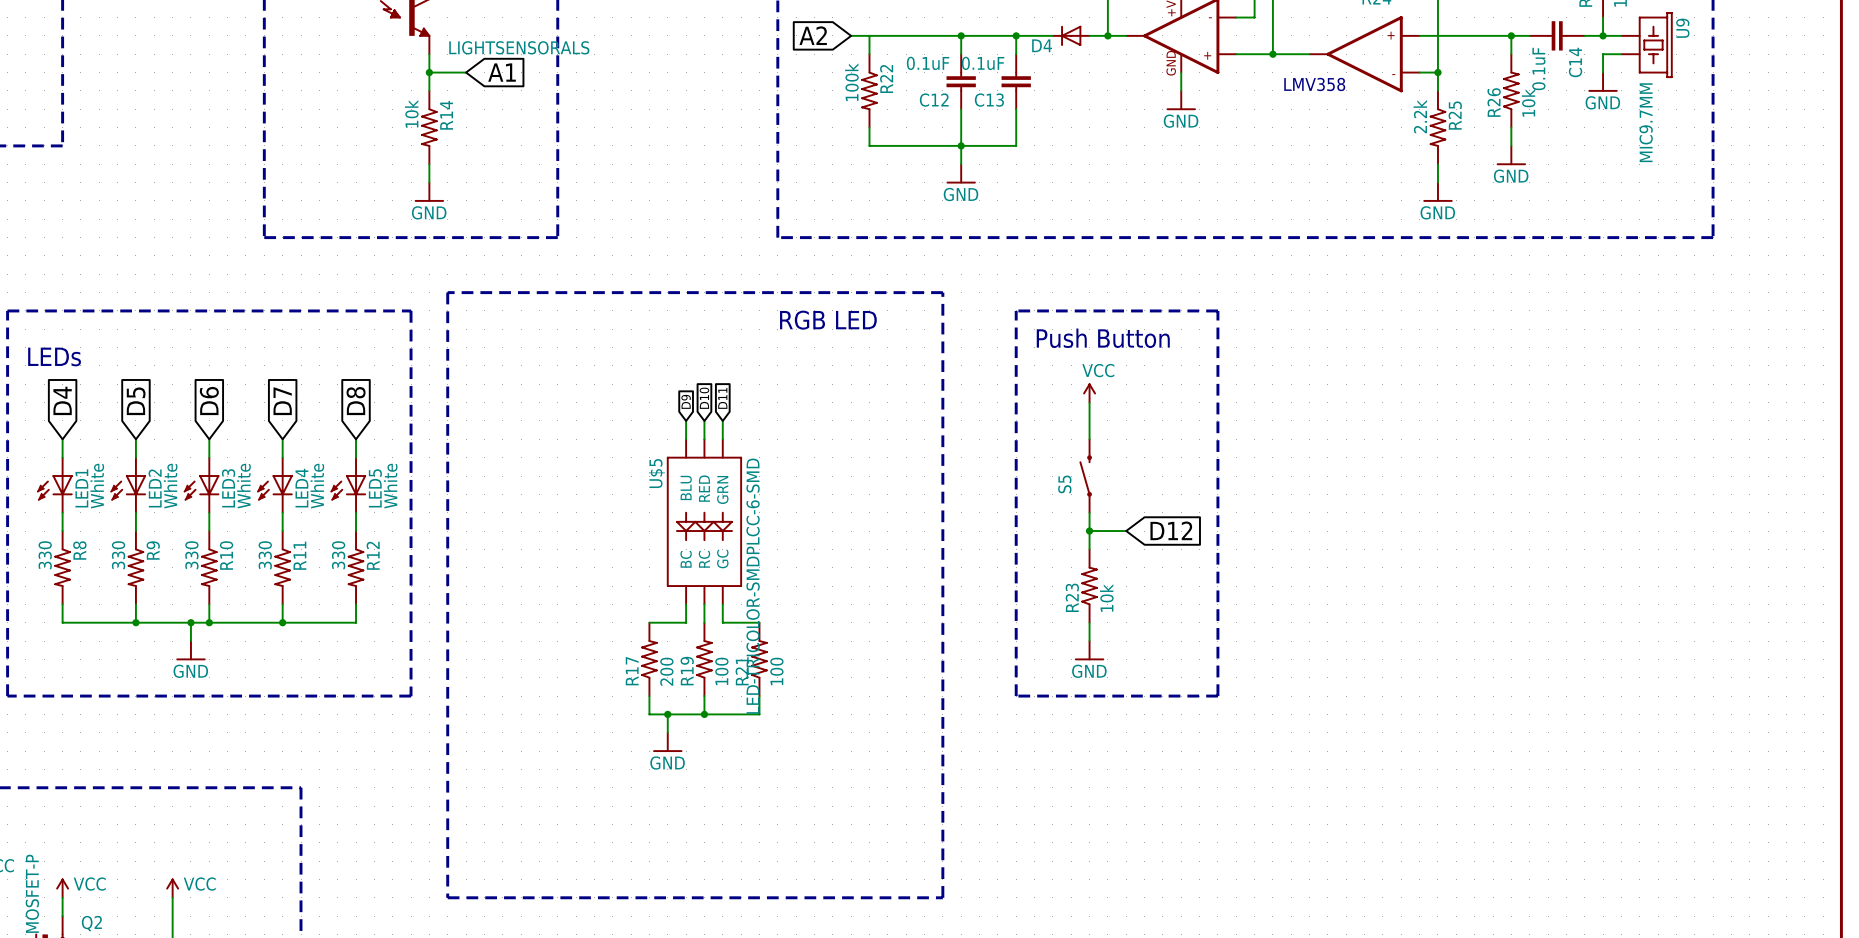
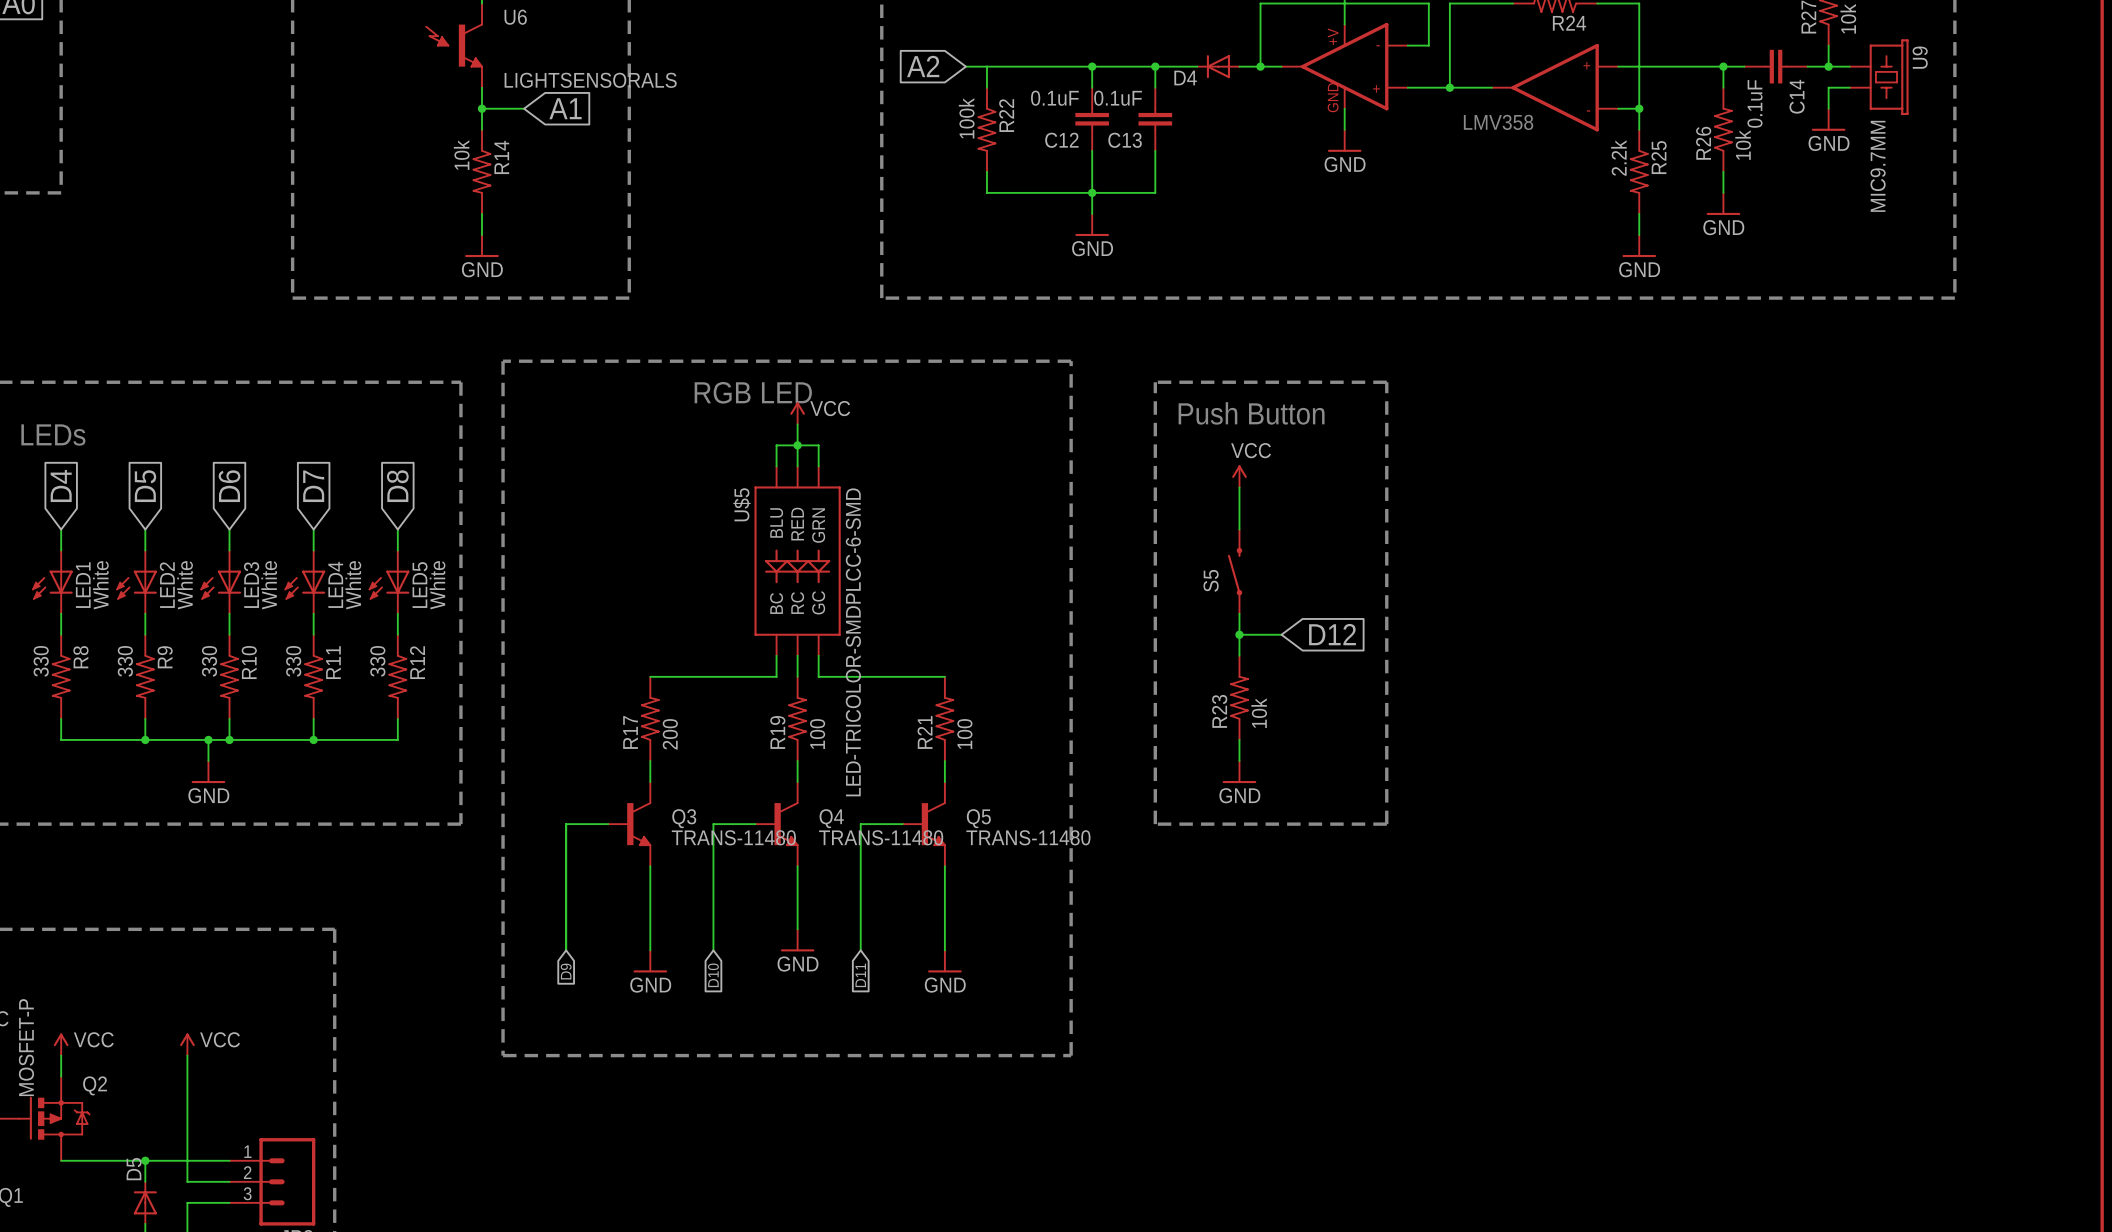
text position: RGB LED (828, 320) -> RGB LED (753, 392)
power symbol: none -> VCC (797, 413)
wire: none -> (797, 424) (797, 466)
junction: none -> (797, 445)
wire: none -> (776, 466) (776, 445) (818, 445) (818, 466)
global label: D10 (704, 398) -> none
global label: D11 (722, 398) -> none
global label: D9 (686, 401) -> none
wire: (686, 420) (686, 439) -> none
wire: (704, 420) (704, 439) -> none
wire: (722, 420) (722, 439) -> none
U$5 position: (704, 521) -> (797, 561)
wire: none -> (776, 655) (776, 676) (650, 676)
wire: none -> (818, 655) (818, 676) (944, 676)
wire: (686, 604) (686, 622) (649, 622) -> none
wire: (704, 604) (704, 622) -> (797, 655) (797, 676)
wire: (722, 604) (722, 622) (759, 622) -> none
wire: none -> (944, 761) (944, 782)
R17 position: (649, 659) -> (650, 718)
R19 position: (704, 659) -> (797, 718)
R21 position: (759, 659) -> (944, 718)
wire: none -> (608, 824) (566, 824) (566, 950)
Q3: none -> TRANS-11480 (629, 824)
wire: (649, 696) (649, 714) (759, 714) -> (860, 950) (860, 845)
wire: none -> (755, 824) (713, 824) (713, 950)
Q4: none -> TRANS-11480 (776, 824)
wire: (704, 696) (704, 714) -> (797, 761) (797, 782)
wire: none -> (860, 824) (902, 824)
Q5: none -> TRANS-11480 (924, 824)
wire: (667, 714) (667, 732) -> (650, 761) (650, 782)
junction: (667, 714) -> none
junction: (704, 714) -> none
wire: none -> (650, 866) (650, 950)
wire: none -> (797, 866) (797, 929)
wire: none -> (944, 866) (944, 950)
power symbol: GND (667, 742) -> none
power symbol: none -> GND (797, 940)
power symbol: none -> GND (650, 961)
power symbol: none -> GND (944, 961)
global label: none -> D9 (566, 971)
global label: none -> D10 (713, 975)
global label: none -> D11 (860, 975)

